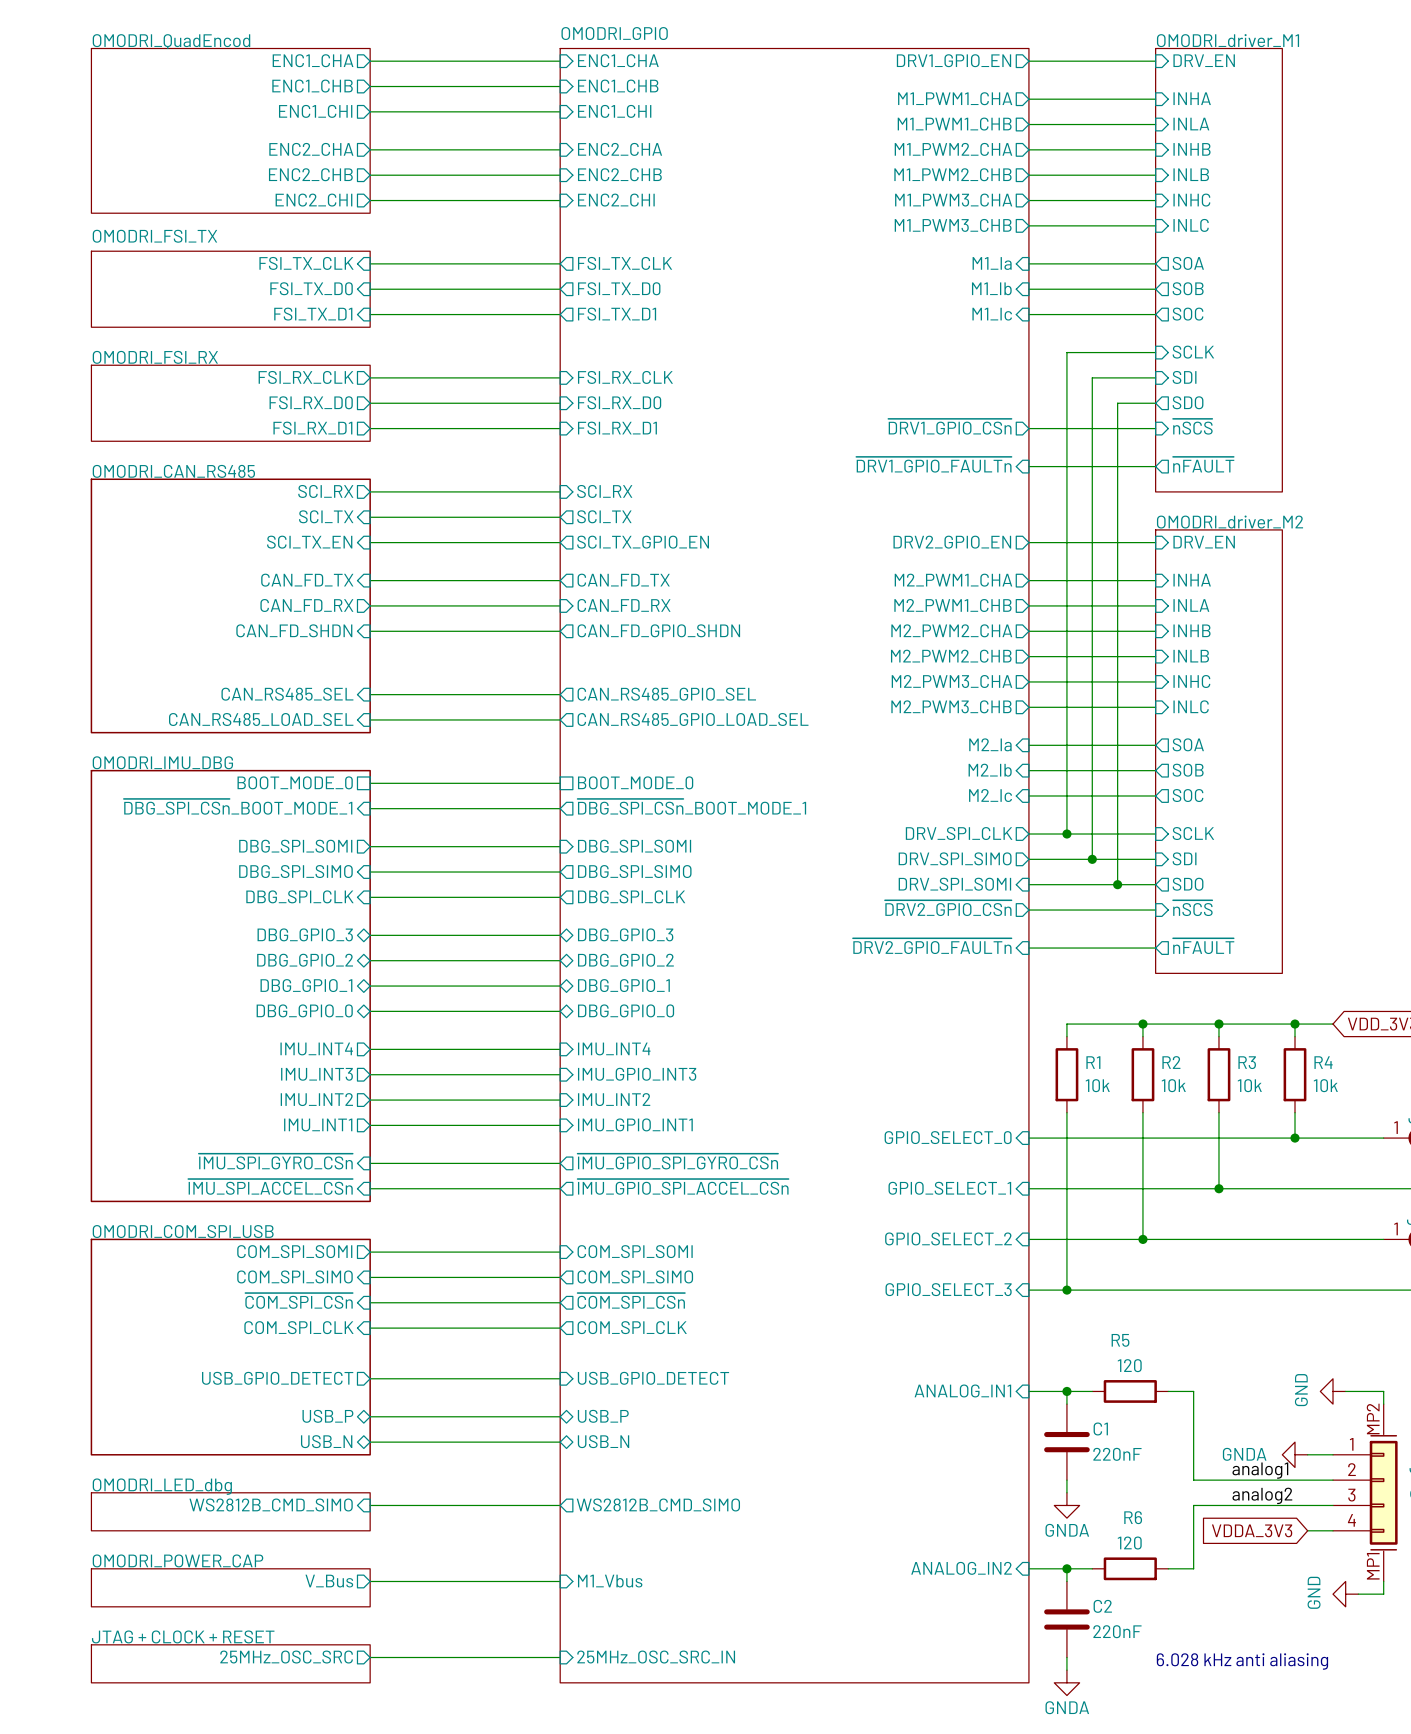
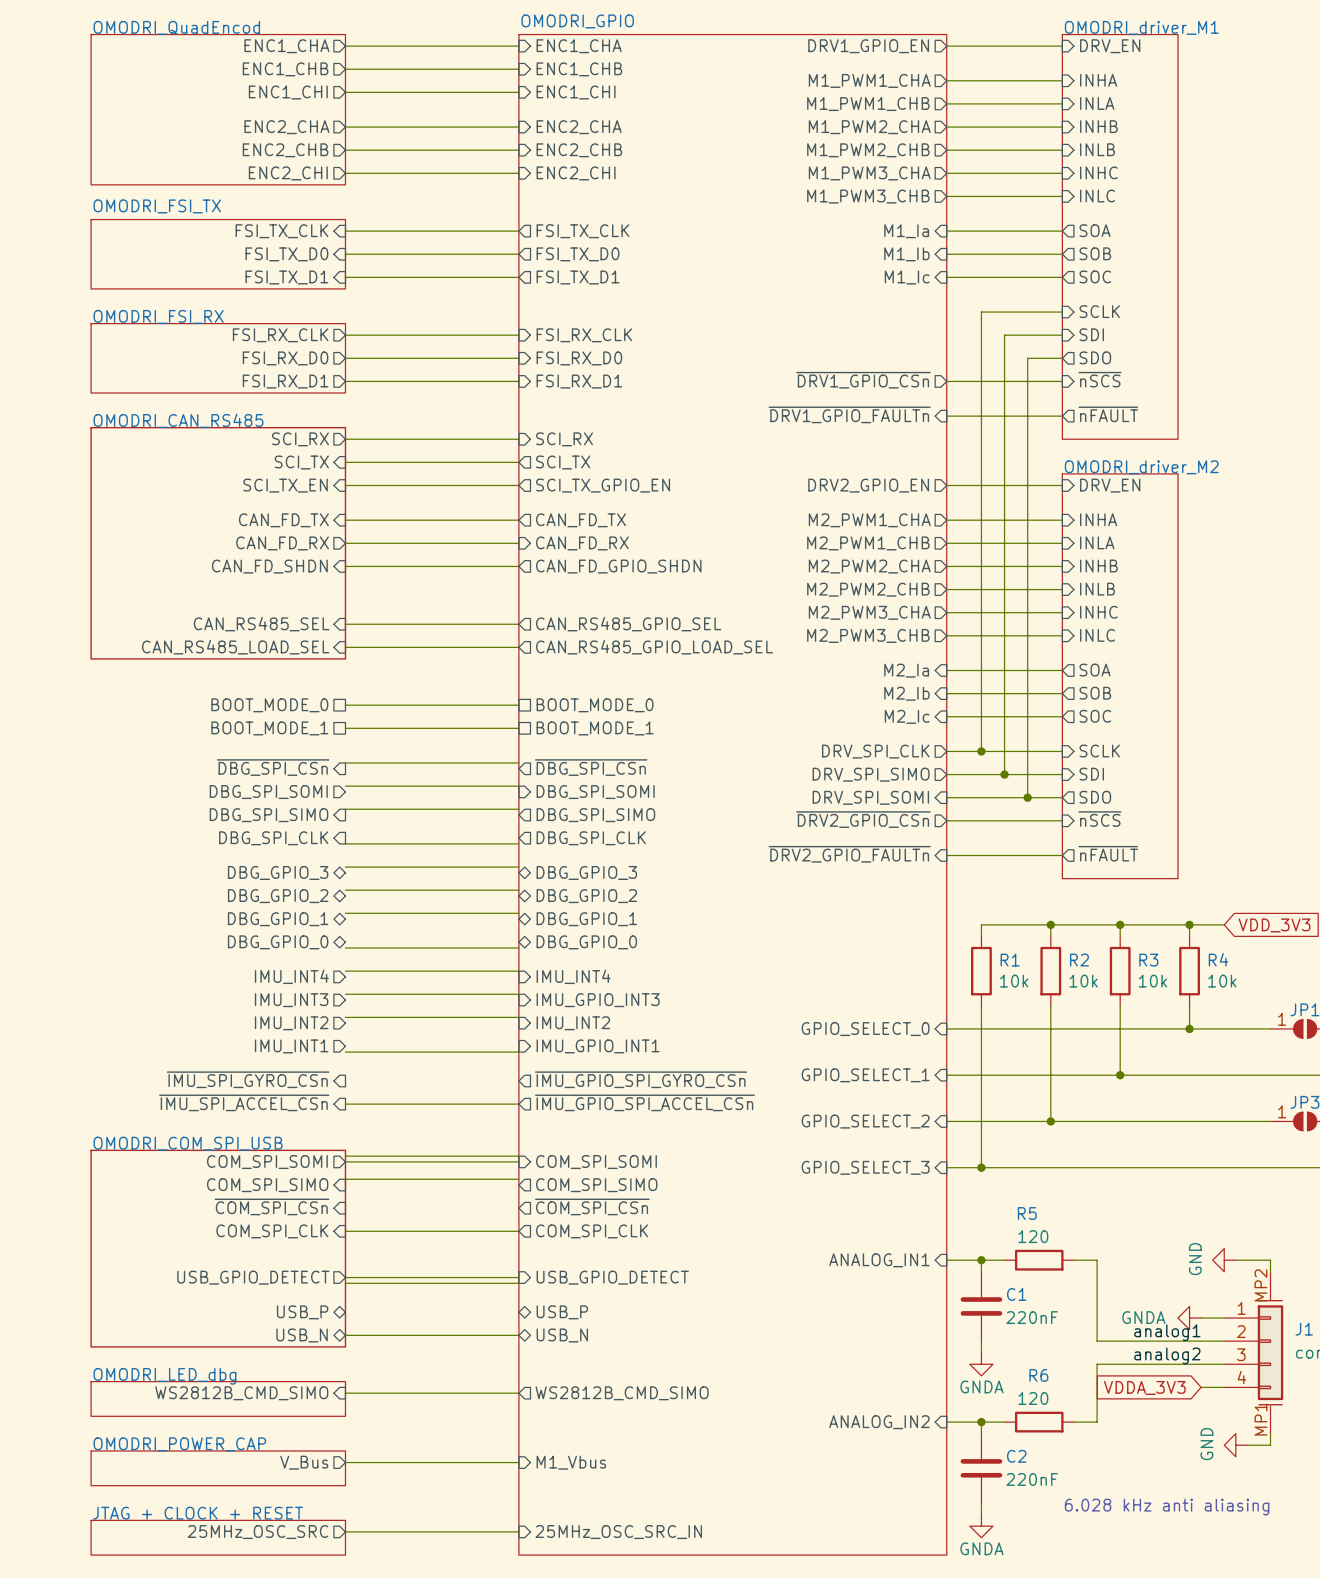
sheet pin shape: input (238, 806) -> passive (269, 728)
sheet pin: ~{DBG_SPI_CSn}_BOOT_MODE_1 (238, 806) -> BOOT_MODE_1 (269, 728)
sheet pin shape: output (691, 806) -> passive (595, 728)
sheet pin: ~{DBG_SPI_CSn}_BOOT_MODE_1 (691, 806) -> BOOT_MODE_1 (595, 728)
sheet pin position: DBG_SPI_SOMI (295, 846) -> DBG_SPI_SOMI (268, 792)
sheet pin position: DBG_SPI_SOMI (634, 846) -> DBG_SPI_SOMI (595, 792)
sheet pin: none -> ~{DBG_SPI_CSn} (273, 767)
sheet pin: none -> ~{DBG_SPI_CSn} (591, 767)
sheet OMODRI_GPIO: (794, 865) -> none
sheet pin position: DBG_SPI_SIMO (295, 871) -> DBG_SPI_SIMO (269, 815)
sheet pin position: DBG_SPI_SIMO (634, 871) -> DBG_SPI_SIMO (595, 815)
sheet OMODRI_GPIO: none -> (732, 794)
sheet pin position: DBG_SPI_CLK (299, 896) -> DBG_SPI_CLK (273, 838)
sheet pin position: DBG_SPI_CLK (631, 896) -> DBG_SPI_CLK (591, 838)
sheet pin position: DBG_GPIO_3 (305, 934) -> DBG_GPIO_3 (278, 872)
sheet pin position: DBG_GPIO_3 (625, 934) -> DBG_GPIO_3 (586, 872)
sheet pin position: DBG_GPIO_2 (305, 960) -> DBG_GPIO_2 (278, 896)
sheet pin position: DBG_GPIO_2 (625, 960) -> DBG_GPIO_2 (586, 896)
sheet pin position: DBG_GPIO_1 (306, 985) -> DBG_GPIO_1 (278, 919)
sheet pin position: DBG_GPIO_1 (623, 985) -> DBG_GPIO_1 (586, 919)
sheet OMODRI_IMU_DBG: (230, 986) -> none
sheet pin position: DBG_GPIO_0 (304, 1010) -> DBG_GPIO_0 (278, 942)
sheet pin position: DBG_GPIO_0 (626, 1010) -> DBG_GPIO_0 (586, 942)
sheet pin position: IMU_INT4 (316, 1048) -> IMU_INT4 (291, 976)
sheet pin position: IMU_INT4 (614, 1048) -> IMU_INT4 (573, 976)
sheet pin position: IMU_INT3 (316, 1074) -> IMU_INT3 (291, 1000)
sheet pin position: IMU_GPIO_INT3 (637, 1074) -> IMU_GPIO_INT3 (598, 1000)
sheet pin position: IMU_INT2 (316, 1099) -> IMU_INT2 (291, 1023)
sheet pin position: IMU_INT2 (614, 1099) -> IMU_INT2 (573, 1023)
sheet pin position: IMU_INT1 (318, 1124) -> IMU_INT1 (291, 1046)
sheet pin position: IMU_GPIO_INT1 (635, 1124) -> IMU_GPIO_INT1 (598, 1046)
sheet pin position: ~{IMU_SPI_GYRO_CSn} (275, 1161) -> ~{IMU_SPI_GYRO_CSn} (248, 1079)
sheet pin position: ~{IMU_GPIO_SPI_GYRO_CSn} (677, 1161) -> ~{IMU_GPIO_SPI_GYRO_CSn} (641, 1079)
sheet pin position: ~{IMU_SPI_ACCEL_CSn} (270, 1186) -> ~{IMU_SPI_ACCEL_CSn} (244, 1102)
sheet pin position: ~{IMU_GPIO_SPI_ACCEL_CSn} (683, 1186) -> ~{IMU_GPIO_SPI_ACCEL_CSn} (644, 1102)
wire: (370, 1188) (560, 1188) -> (345, 1104) (518, 1104)
sheet pin position: COM_SPI_SOMI (294, 1251) -> COM_SPI_SOMI (267, 1162)
sheet pin position: COM_SPI_SOMI (635, 1251) -> COM_SPI_SOMI (596, 1162)
wire: (370, 1252) (560, 1252) -> (345, 1161) (518, 1161)
sheet pin position: COM_SPI_SIMO (294, 1276) -> COM_SPI_SIMO (267, 1185)
sheet pin position: COM_SPI_SIMO (635, 1276) -> COM_SPI_SIMO (596, 1185)
sheet pin position: ~{COM_SPI_CSn} (299, 1300) -> ~{COM_SPI_CSn} (272, 1206)
sheet pin position: ~{COM_SPI_CSn} (631, 1300) -> ~{COM_SPI_CSn} (592, 1206)
sheet pin position: COM_SPI_CLK (298, 1327) -> COM_SPI_CLK (272, 1231)
sheet pin position: COM_SPI_CLK (632, 1327) -> COM_SPI_CLK (592, 1231)
wire: (370, 1328) (560, 1328) -> (345, 1231) (518, 1231)
sheet OMODRI_COM_SPI_USB position: (230, 1347) -> (218, 1248)
sheet pin position: USB_GPIO_DETECT (277, 1378) -> USB_GPIO_DETECT (253, 1277)
wire: (370, 1378) (560, 1378) -> (345, 1277) (518, 1277)
sheet pin position: USB_GPIO_DETECT (653, 1378) -> USB_GPIO_DETECT (612, 1277)
sheet pin position: USB_P (327, 1416) -> USB_P (302, 1312)
sheet pin position: USB_P (603, 1416) -> USB_P (562, 1312)
sheet pin position: USB_N (326, 1441) -> USB_N (302, 1335)
sheet pin position: USB_N (603, 1441) -> USB_N (562, 1335)
wire: (370, 1442) (560, 1442) -> (345, 1335) (518, 1335)
sheet pin position: WS2812B_CMD_SIMO (271, 1504) -> WS2812B_CMD_SIMO (241, 1393)
sheet pin position: WS2812B_CMD_SIMO (658, 1504) -> WS2812B_CMD_SIMO (622, 1393)
wire: (370, 1505) (560, 1505) -> (345, 1393) (518, 1393)
sheet OMODRI_LED_dbg position: (230, 1511) -> (218, 1398)
sheet pin position: V_Bus (329, 1581) -> V_Bus (304, 1462)
wire: (370, 1581) (560, 1581) -> (345, 1462) (518, 1462)
sheet pin position: M1_Vbus (610, 1581) -> M1_Vbus (571, 1462)
sheet OMODRI_POWER_CAP position: (230, 1587) -> (218, 1468)
sheet pin position: 25MHz_OSC_SRC (286, 1657) -> 25MHz_OSC_SRC (258, 1532)
wire: (370, 1657) (560, 1657) -> (345, 1531) (518, 1531)
sheet pin position: 25MHz_OSC_SRC_IN (656, 1657) -> 25MHz_OSC_SRC_IN (618, 1532)
sheet JTAG + CLOCK + RESET position: (230, 1663) -> (218, 1537)

